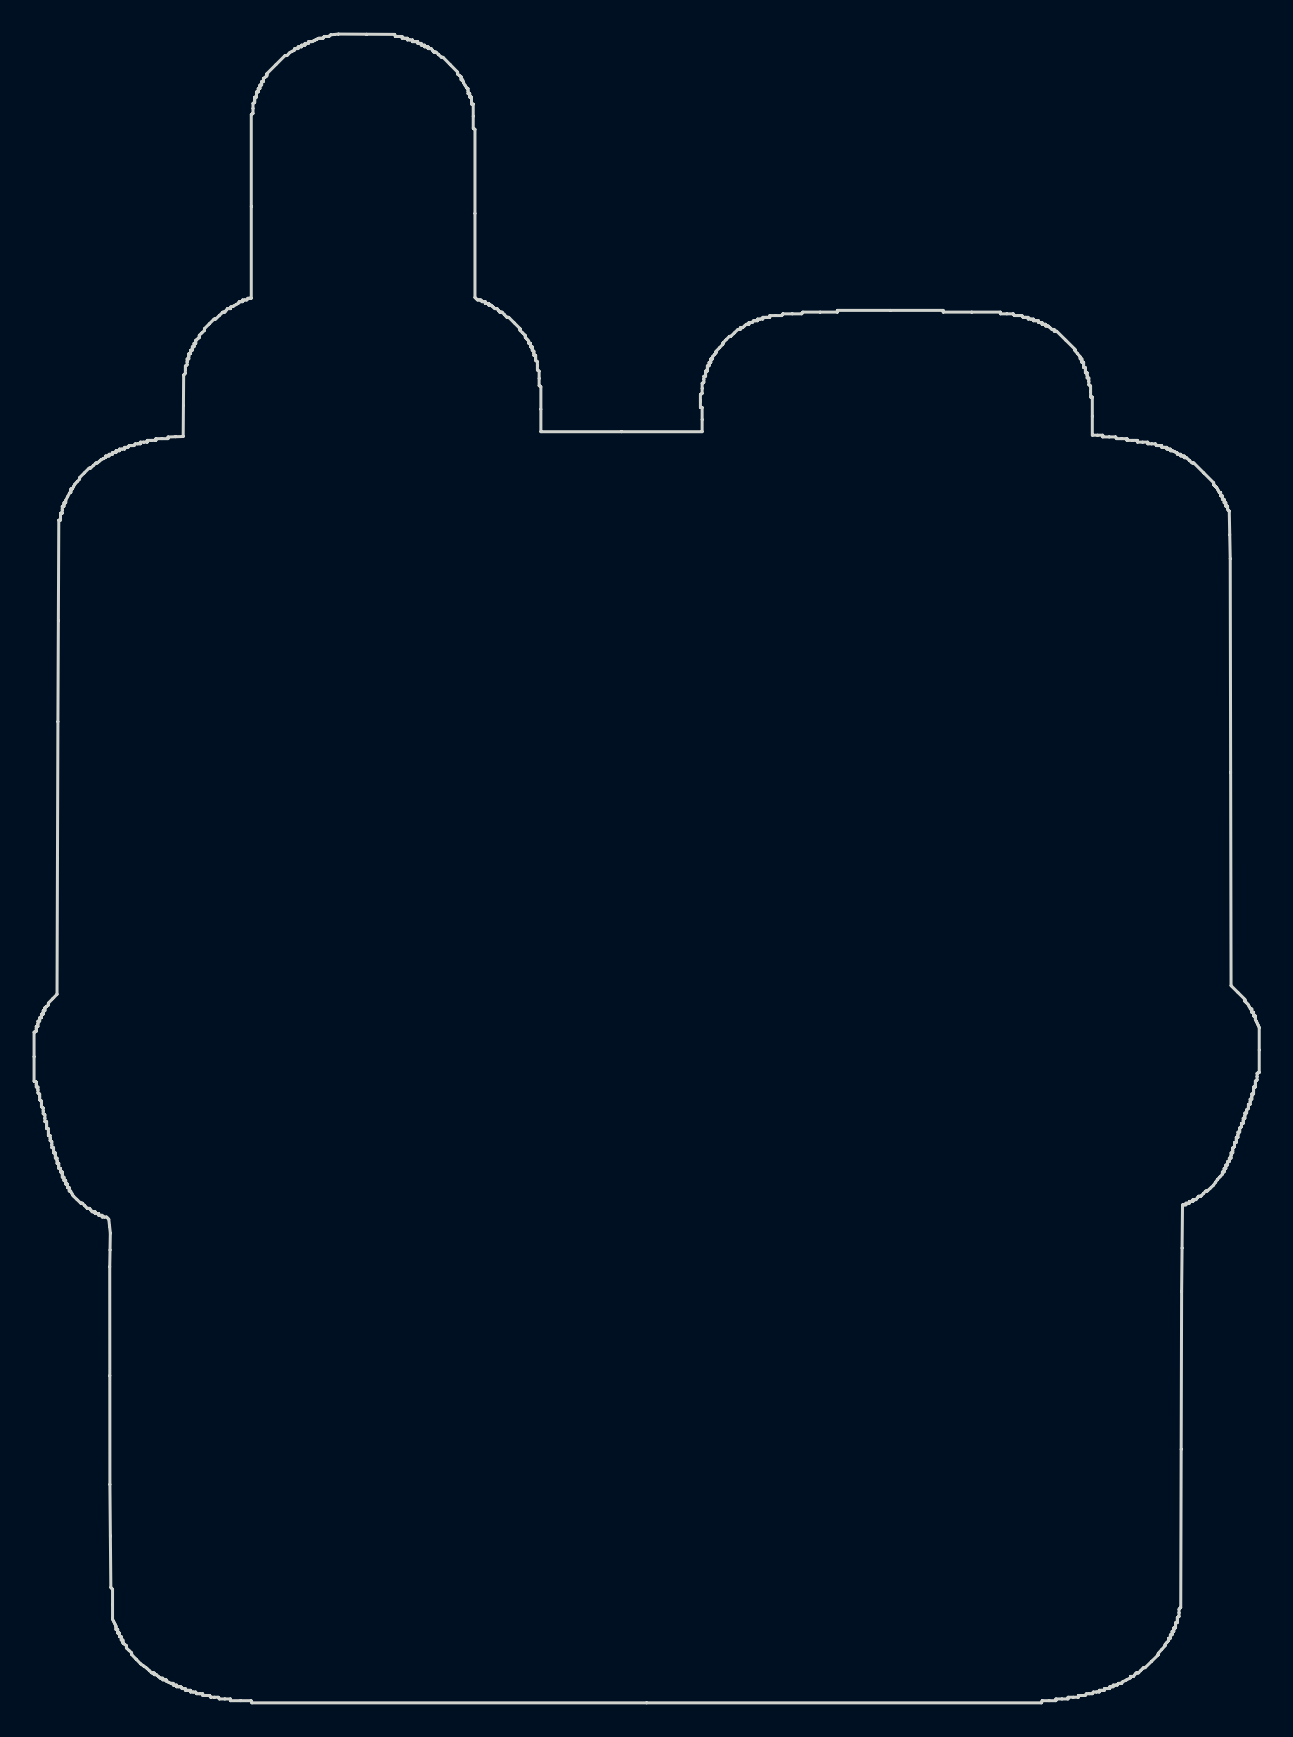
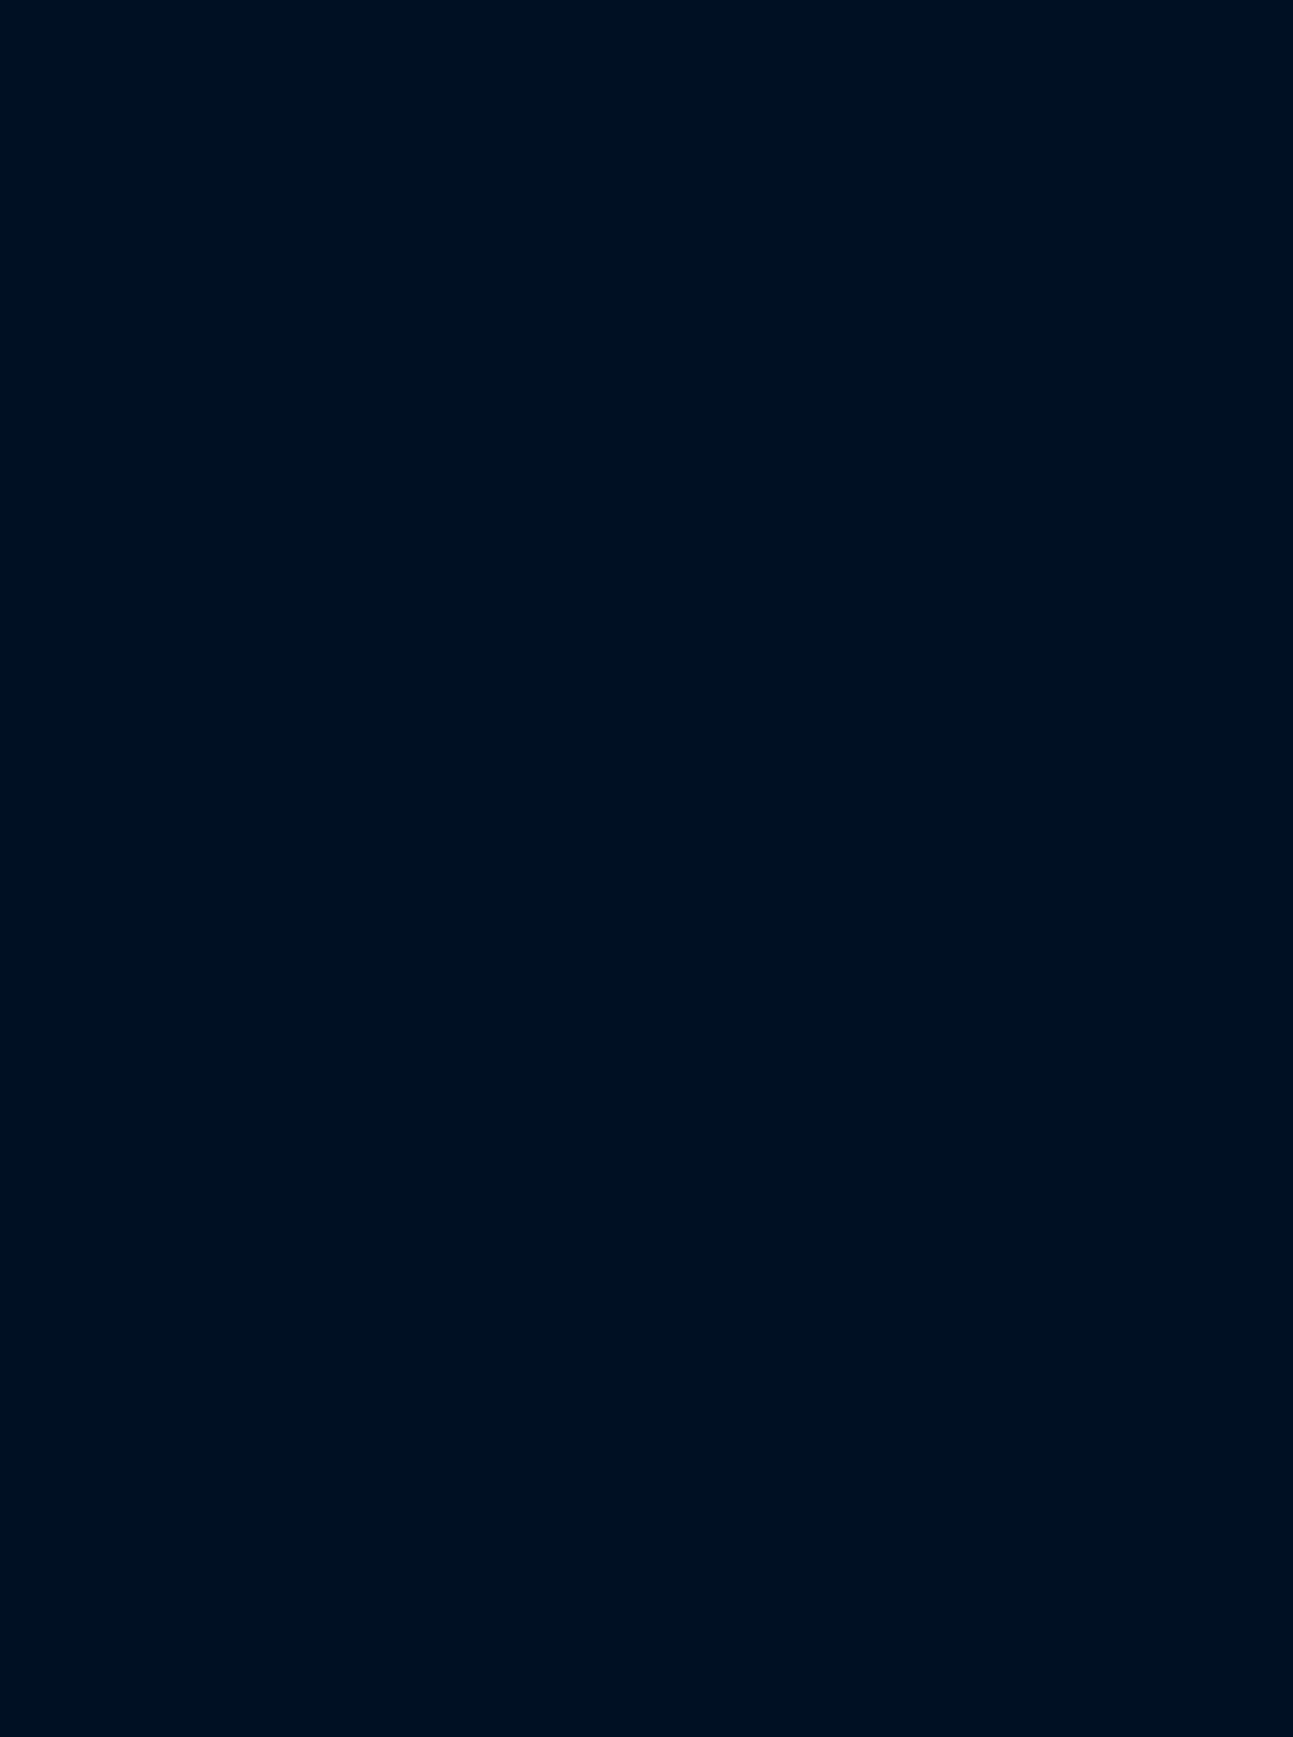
board edge: (338, 34) (394, 34) (395, 36) (402, 36) (407, 39) (412, 39) (412, 41) (417, 41) (442, 57) (457, 72) (468, 88) (468, 93) (471, 97) (471, 104) (473, 104) (473, 128) (474, 129) (474, 297) (488, 303) (508, 317) (520, 328) (532, 346) (537, 361) (539, 385) (540, 386) (540, 431) (702, 431) (700, 394) (702, 393) (703, 376) (705, 376) (710, 358) (722, 342) (737, 329) (748, 322) (762, 319) (762, 317) (781, 315) (782, 313) (801, 313) (802, 312) (837, 312) (837, 310) (1000, 312) (1000, 313) (1013, 313) (1038, 320) (1038, 322) (1056, 331) (1074, 349) (1083, 362) (1090, 385) (1092, 435) (1155, 443) (1184, 455) (1213, 482) (1227, 506) (1230, 558) (1231, 985) (1251, 1008) (1259, 1027) (1259, 1072) (1257, 1073) (1250, 1104) (1244, 1113) (1243, 1123) (1241, 1123) (1232, 1152) (1231, 1152) (1231, 1158) (1224, 1168) (1224, 1171) (1213, 1185) (1200, 1196) (1182, 1204) (1180, 1607) (1175, 1627) (1158, 1654) (1138, 1672) (1121, 1683) (1113, 1685) (1109, 1688) (1104, 1688) (1104, 1690) (1099, 1690) (1099, 1692) (1078, 1695) (1078, 1697) (1042, 1700) (1041, 1702) (251, 1702) (251, 1700) (230, 1700) (230, 1698) (202, 1695) (202, 1693) (185, 1690) (185, 1688) (162, 1679) (151, 1672) (131, 1654) (116, 1629) (112, 1619) (112, 1589) (110, 1587) (108, 1219) (87, 1208) (69, 1191) (65, 1180) (62, 1177) (62, 1171) (58, 1168) (53, 1147) (51, 1147) (37, 1087) (34, 1081) (34, 1032) (36, 1031) (37, 1021) (39, 1021) (44, 1007) (57, 994) (58, 520) (60, 520) (60, 513) (62, 513) (62, 506) (65, 502) (70, 488) (89, 468) (105, 455) (129, 445) (140, 443) (140, 442) (183, 436) (183, 375) (188, 353) (190, 353) (199, 335) (214, 319) (239, 301) (251, 298) (251, 114) (256, 91) (258, 91) (266, 73) (294, 48) (318, 38) (338, 34) -> none

